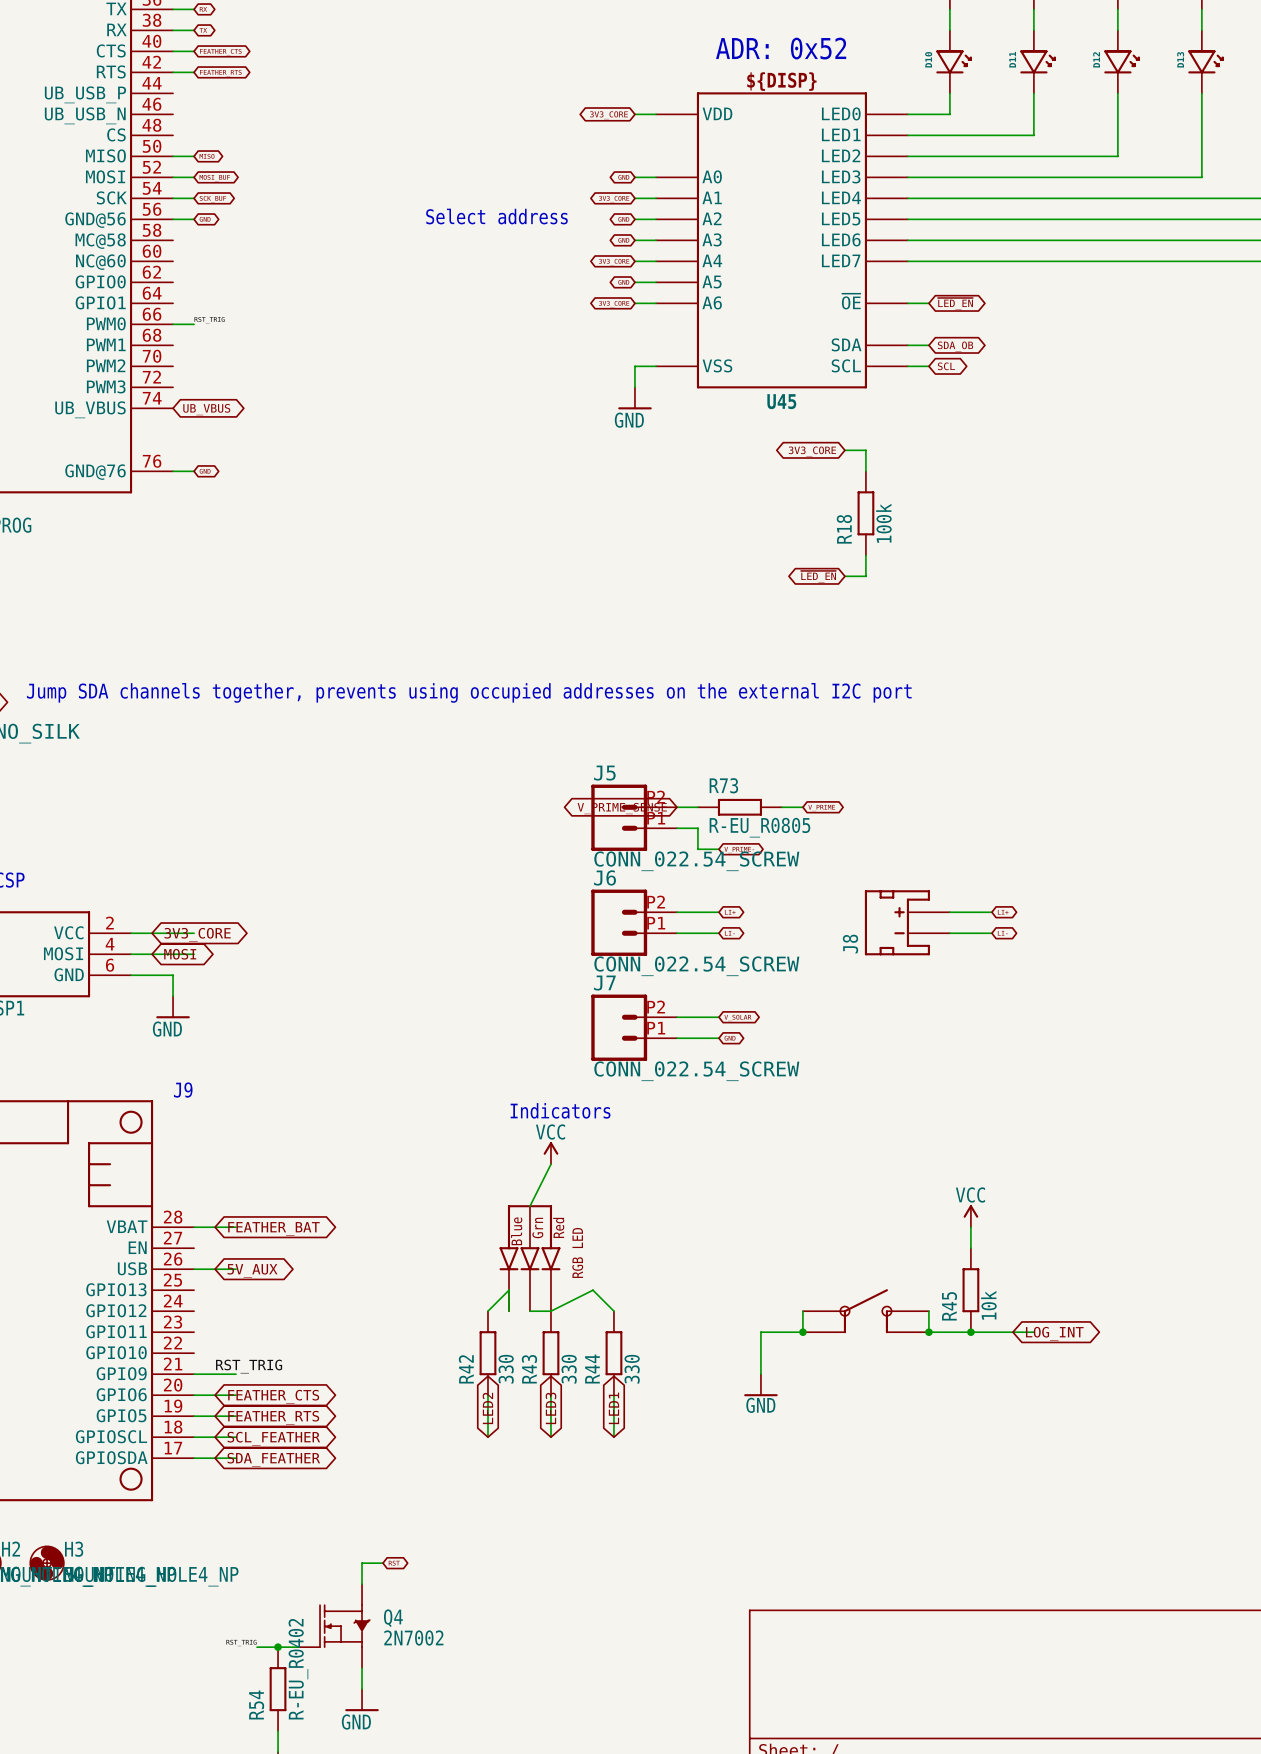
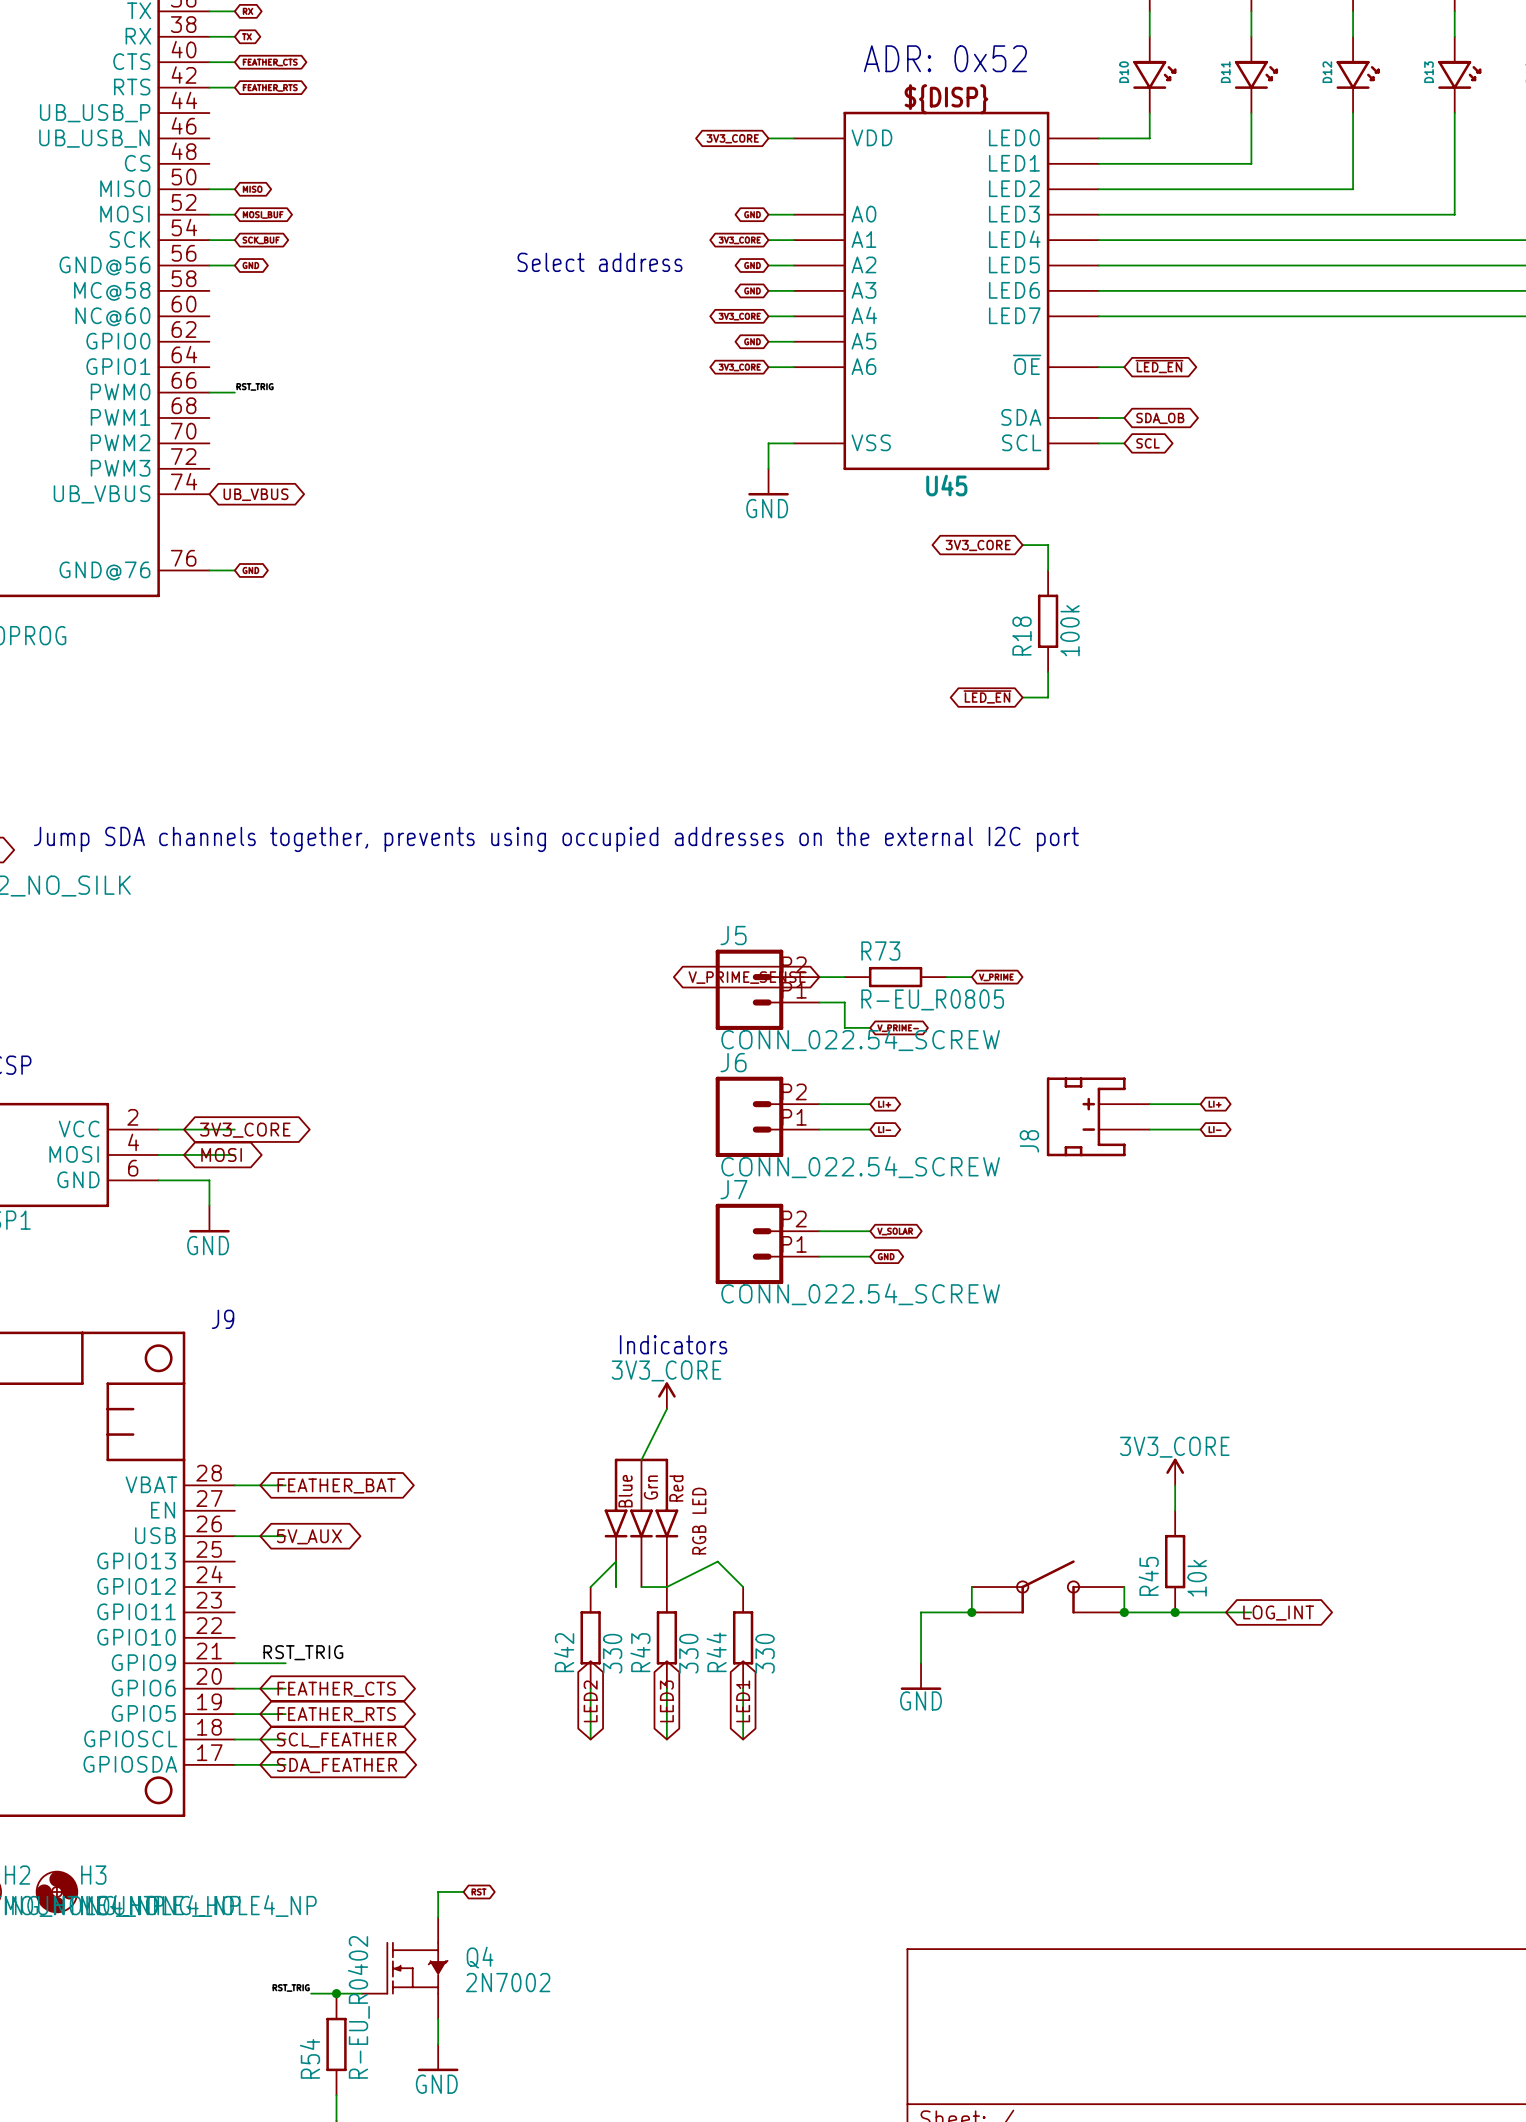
power symbol: VCC (550, 1153) -> 3V3_CORE (666, 1395)
power symbol: VCC (970, 1216) -> 3V3_CORE (1175, 1472)

